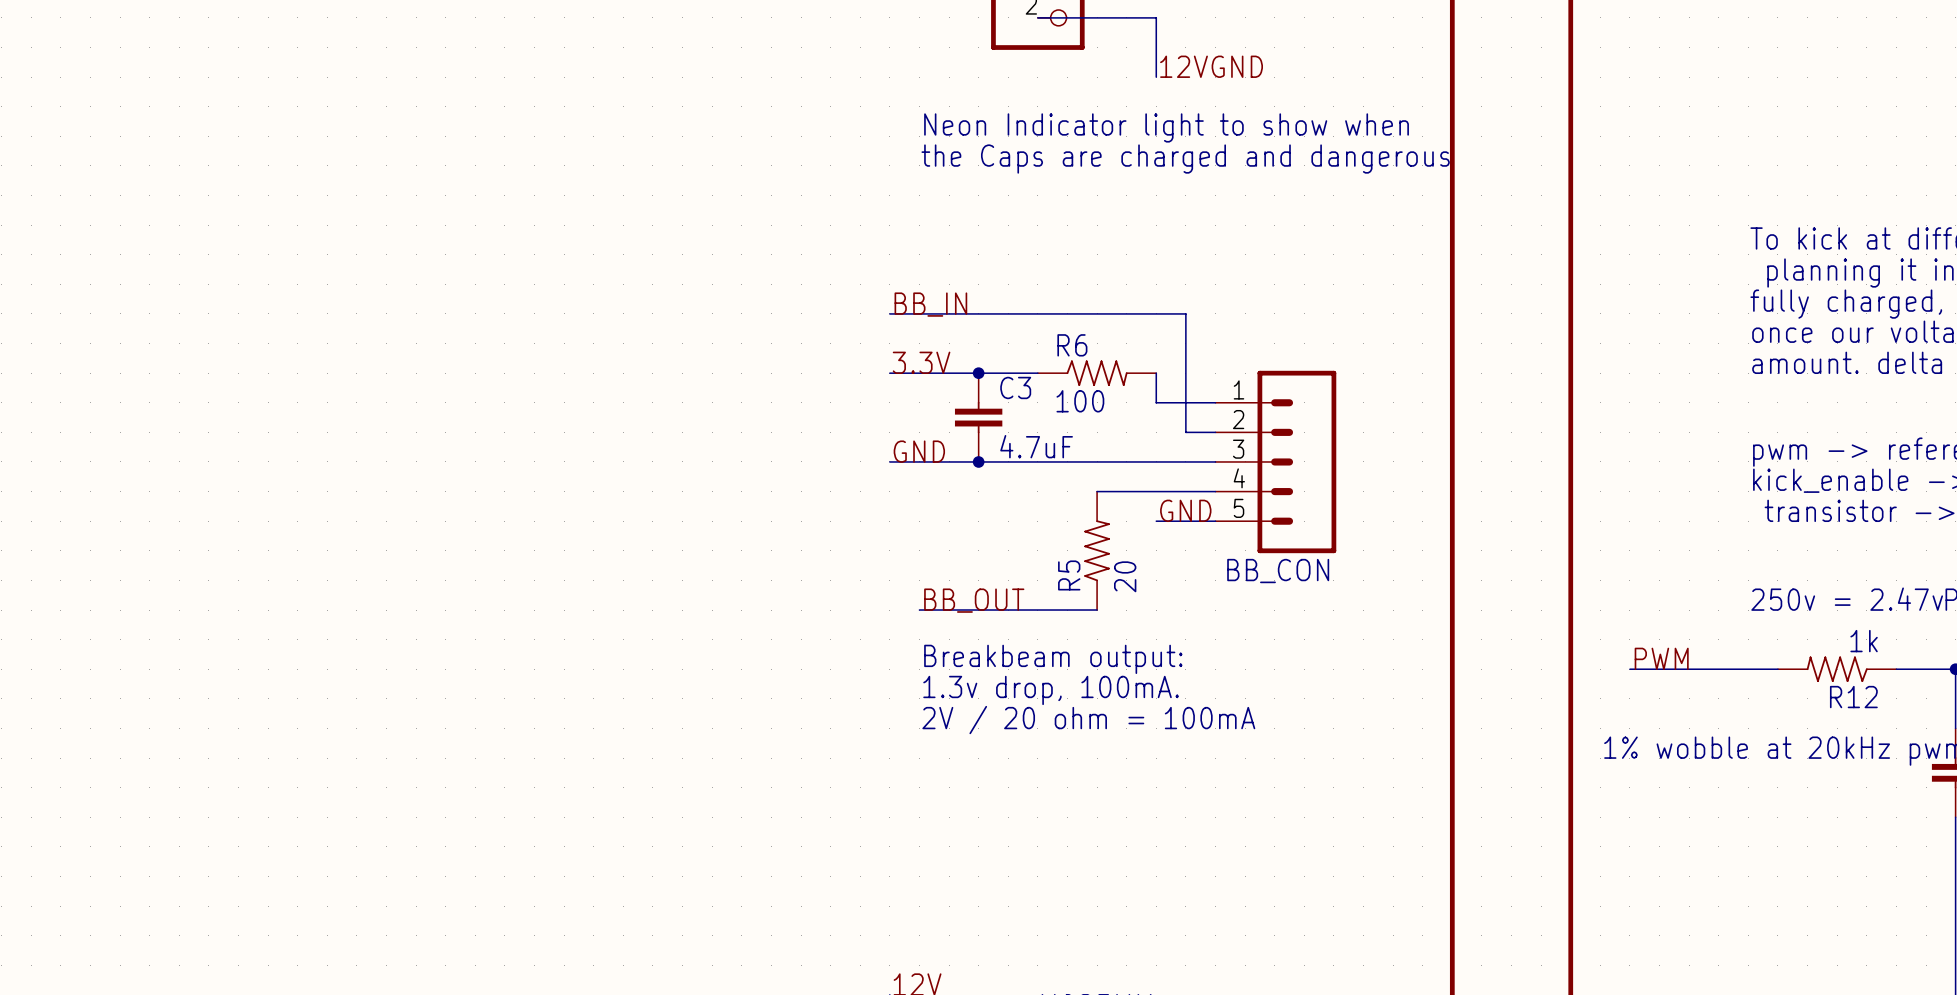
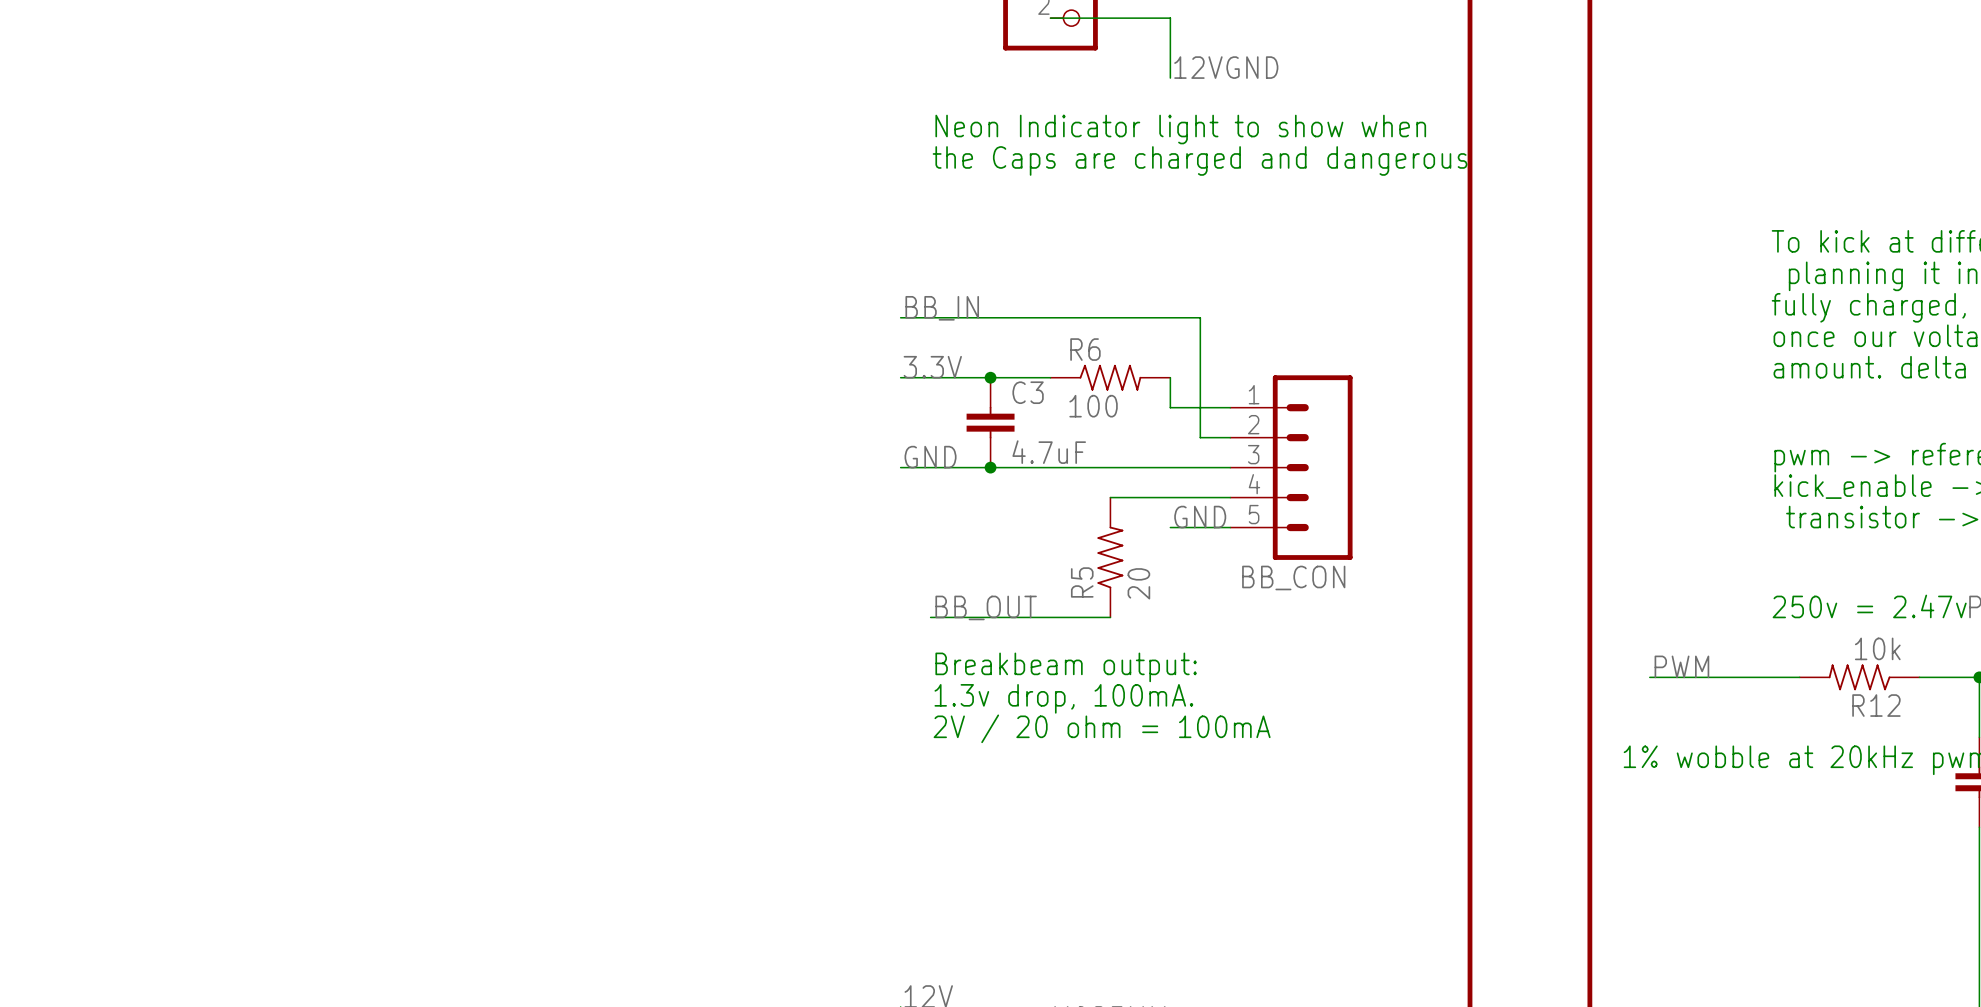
R12 value: 1k (1864, 641) -> 10k (1877, 648)

